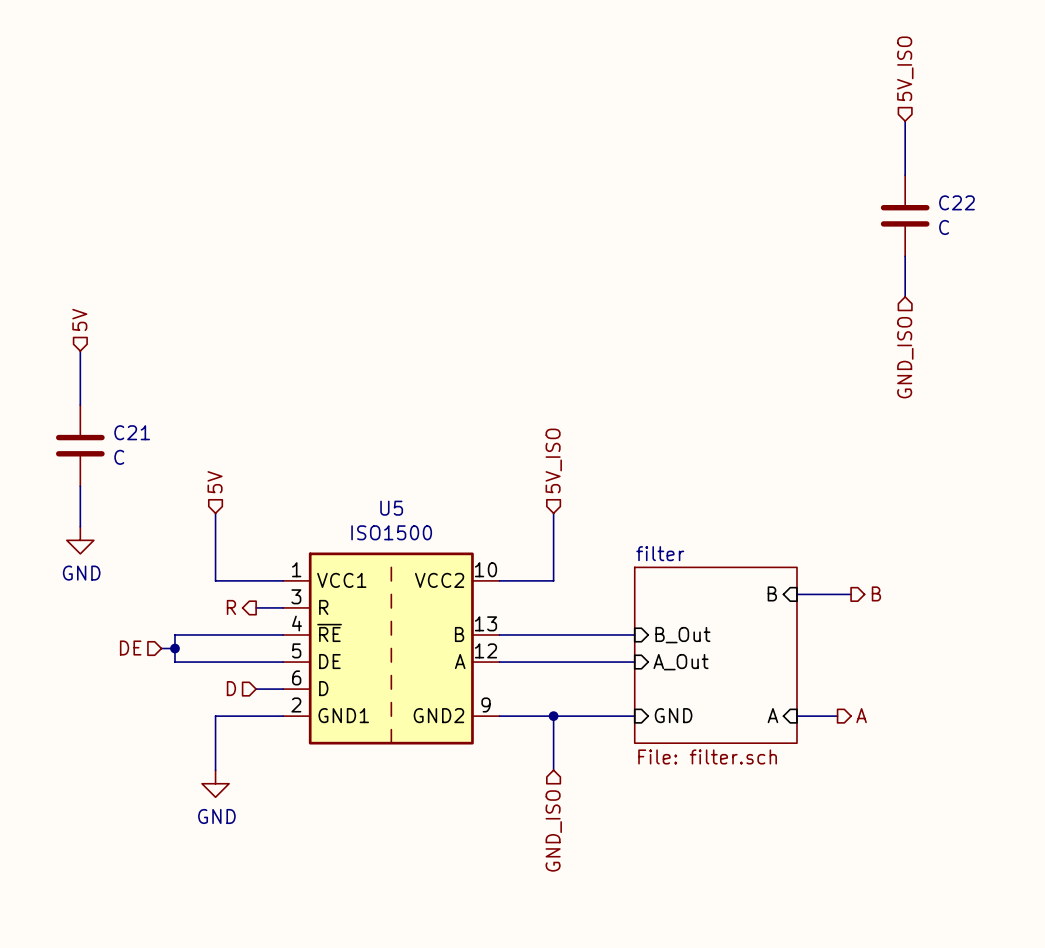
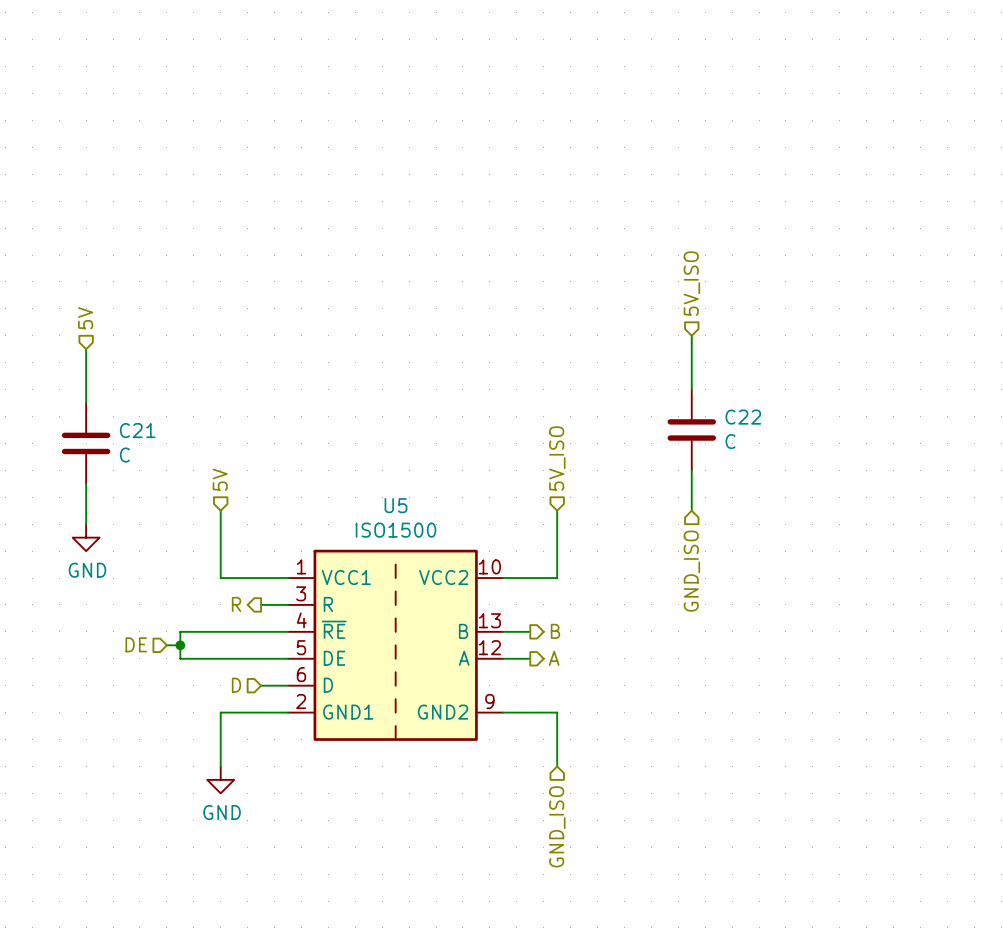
hierarchical label: 5V_ISO (905, 68) -> none
wire: (905, 121) (905, 175) -> none
C22 position: (905, 215) -> (691, 429)
wire: (905, 256) (905, 296) -> none
hierarchical label: none -> 5V_ISO (691, 283)
wire: none -> (691, 335) (691, 389)
hierarchical label: GND_ISO (905, 357) -> none
wire: none -> (691, 470) (691, 510)
hierarchical label: none -> GND_ISO (691, 571)
sheet pin: B (772, 593) -> none
hierarchical label: B (876, 593) -> none
wire: (796, 594) (851, 594) -> none
wire: (526, 634) (634, 634) -> none
hierarchical label: none -> B (555, 631)
sheet pin: B_Out (682, 635) -> none
sheet filter: File: filter.sch (715, 655) -> none
hierarchical label: none -> A (554, 658)
wire: (526, 662) (634, 662) -> none
sheet pin: A_Out (680, 662) -> none
sheet pin: GND (673, 715) -> none
sheet pin: A (772, 715) -> none
hierarchical label: A (861, 715) -> none
wire: (553, 716) (634, 716) -> none
junction: (553, 716) -> none
wire: (796, 716) (837, 716) -> none

